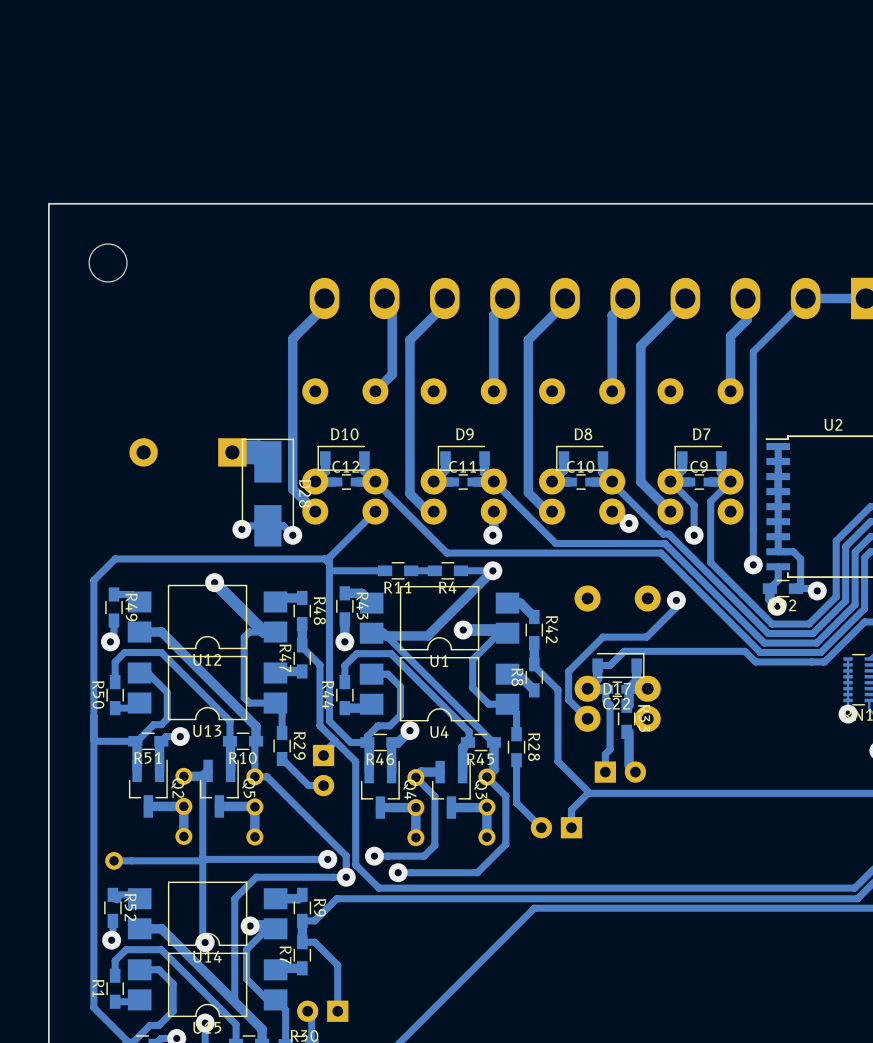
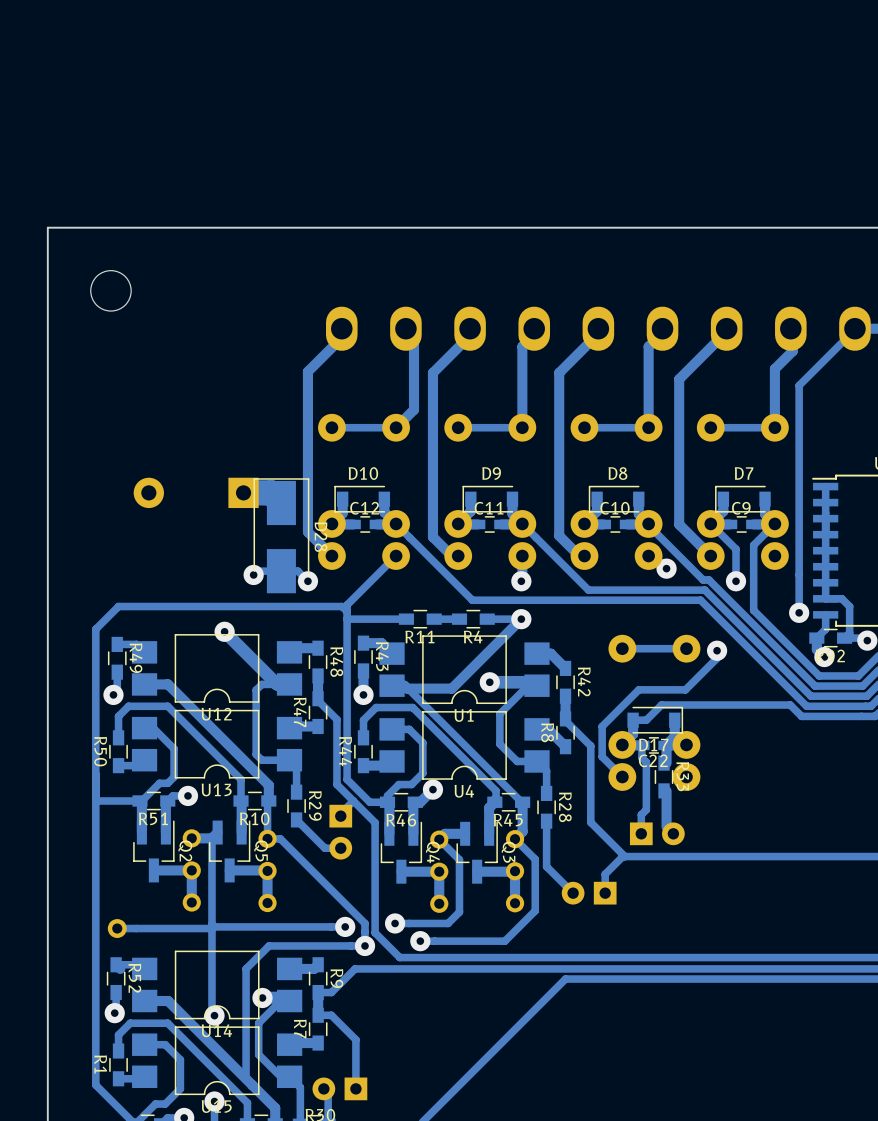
track: none -> (396, 427) (331, 427)
track: none -> (522, 427) (458, 427)
track: none -> (648, 427) (584, 427)
track: none -> (774, 427) (710, 427)
track: none -> (686, 648) (622, 648)

